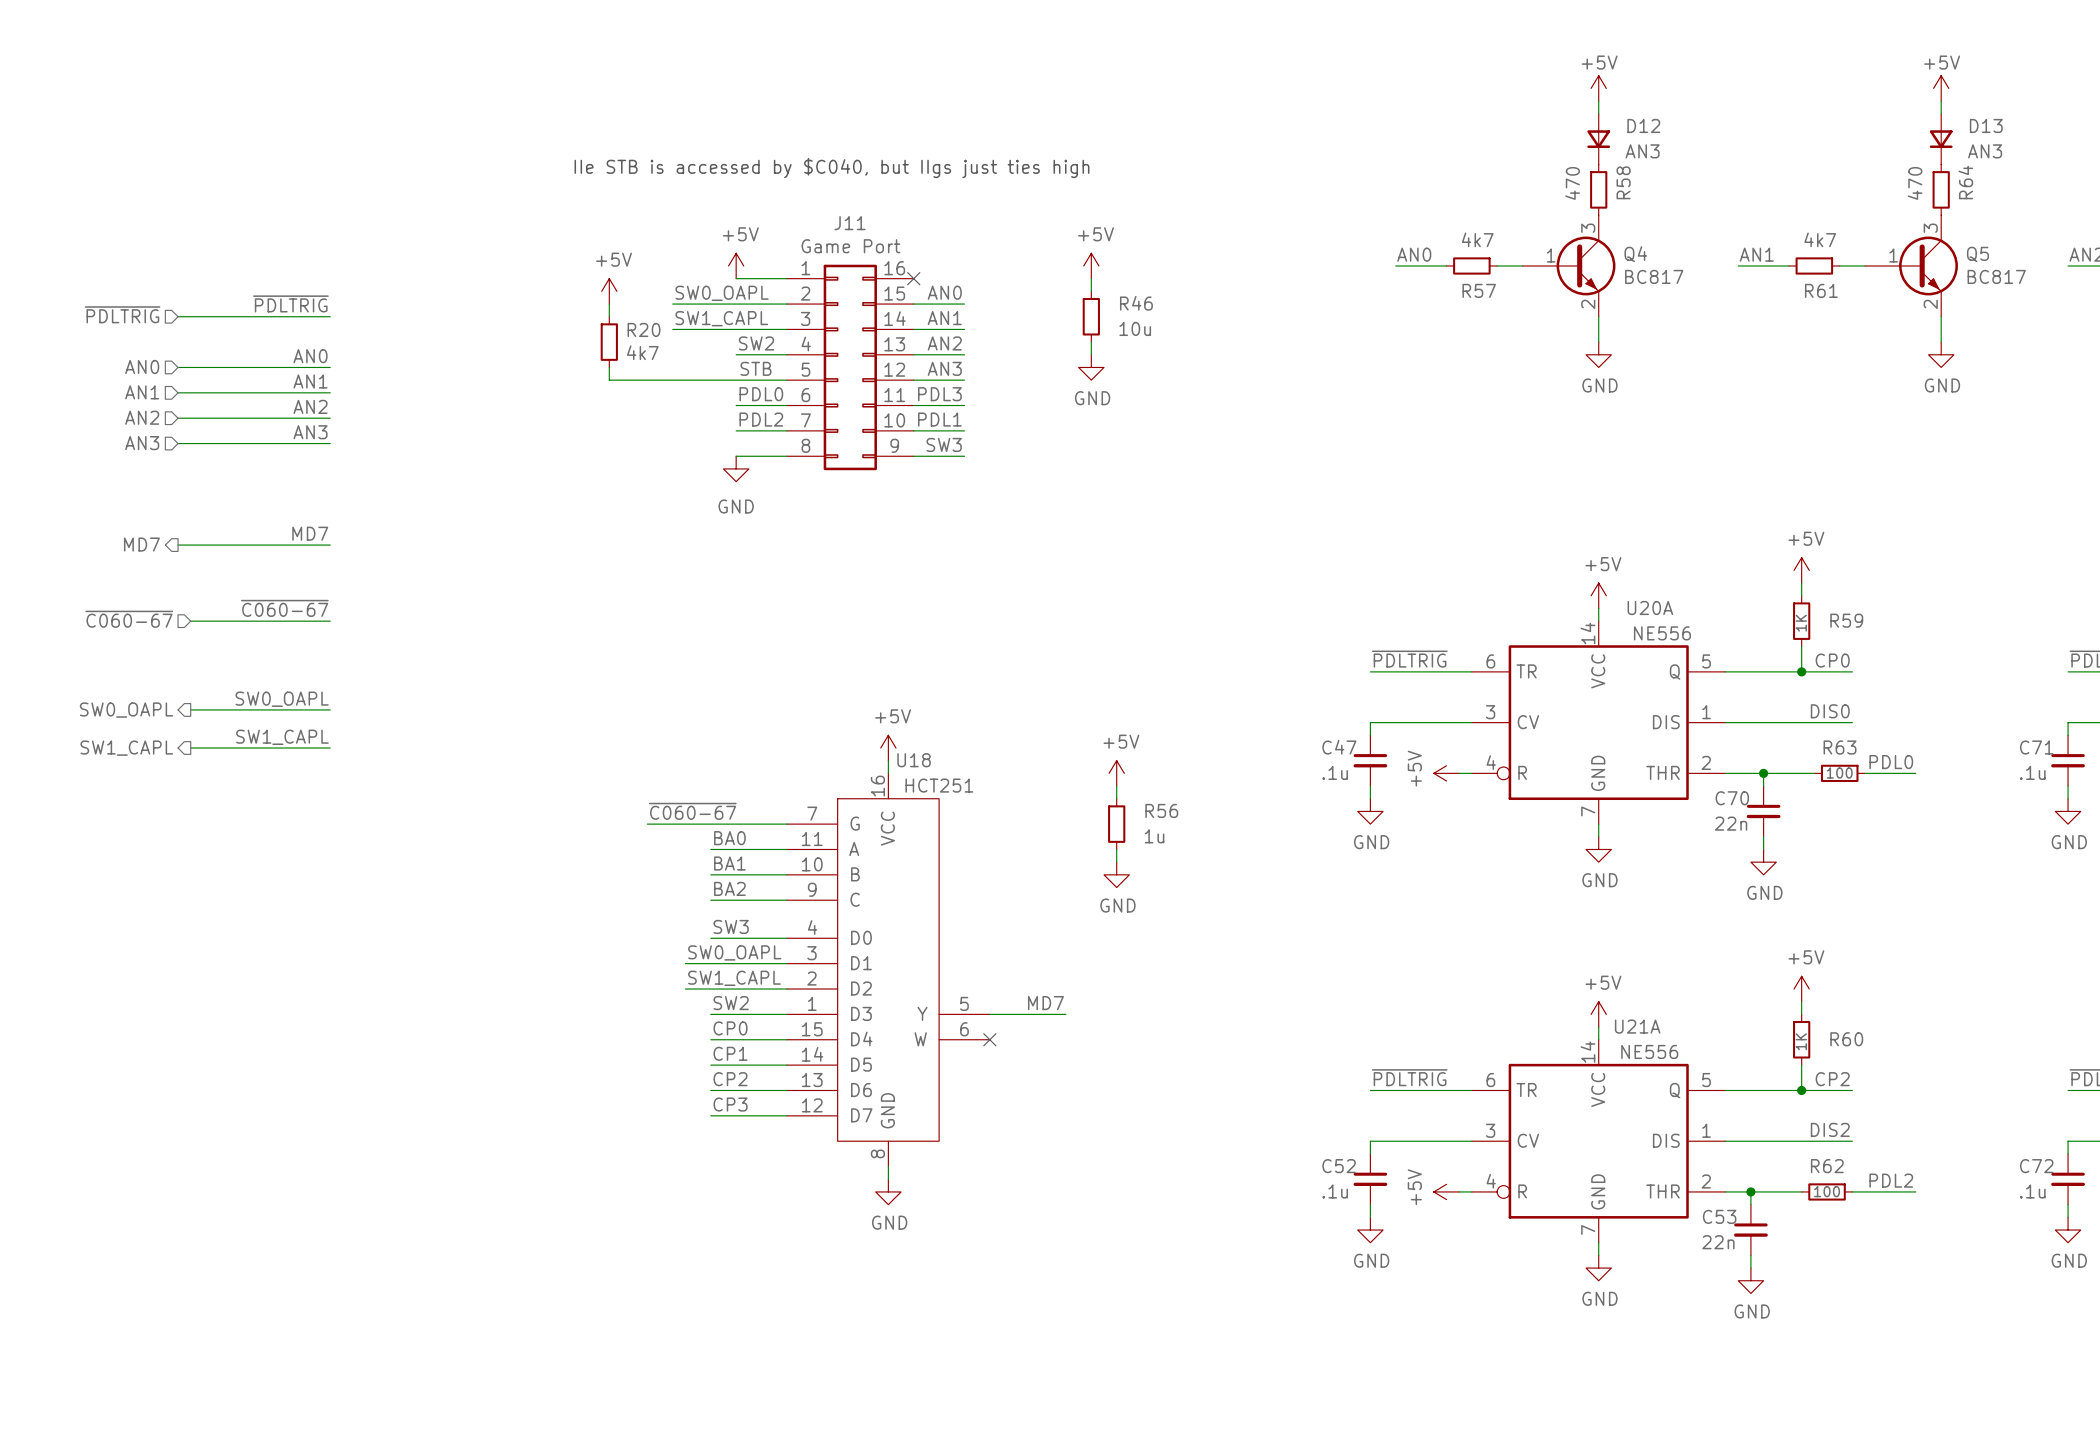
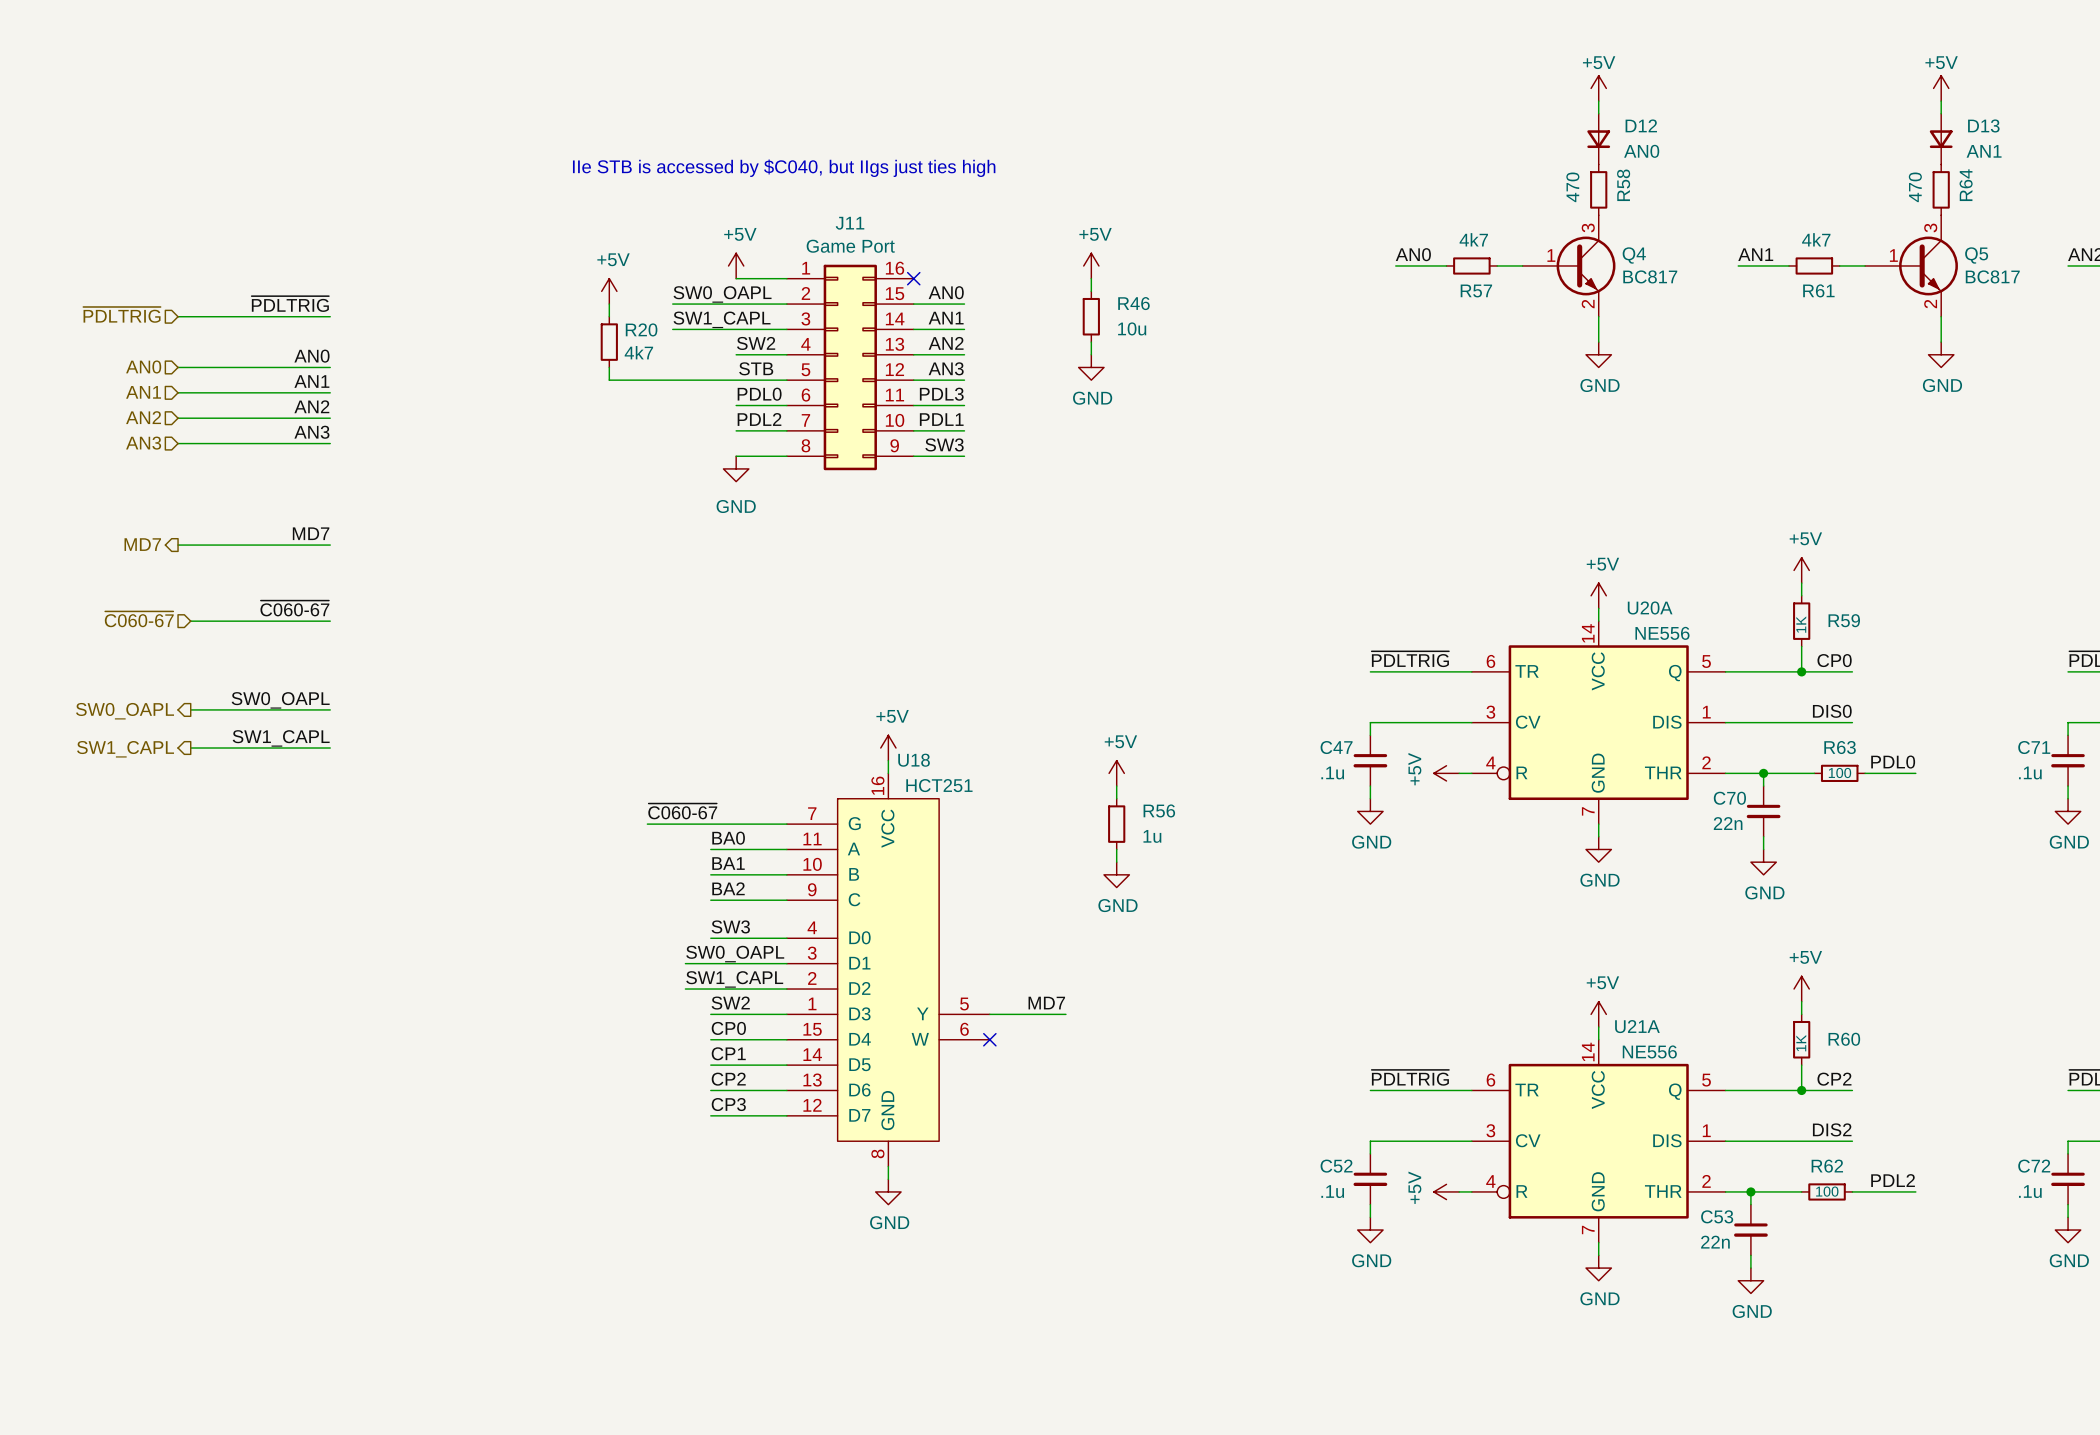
D12 value: AN3 (1642, 151) -> AN0 (1641, 151)
D13 value: AN3 (1985, 151) -> AN1 (1984, 151)

